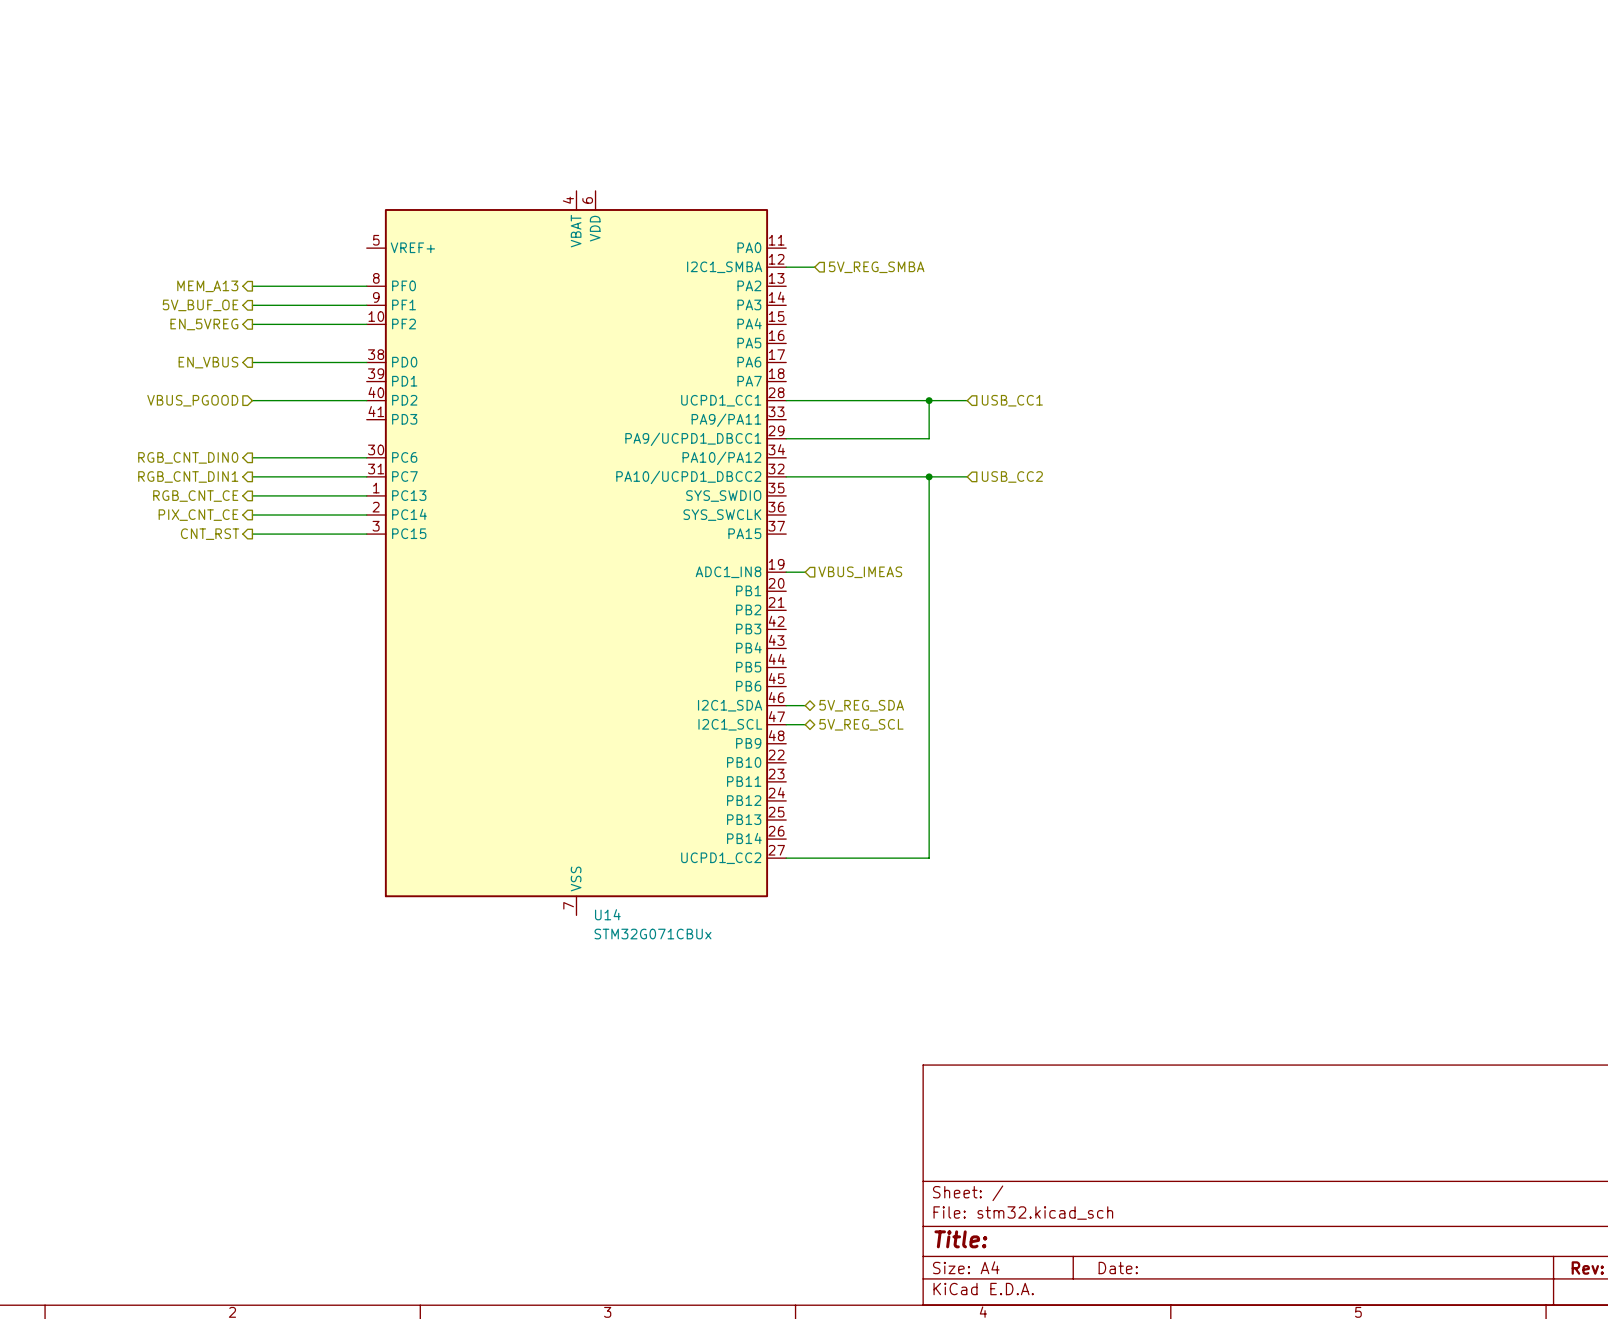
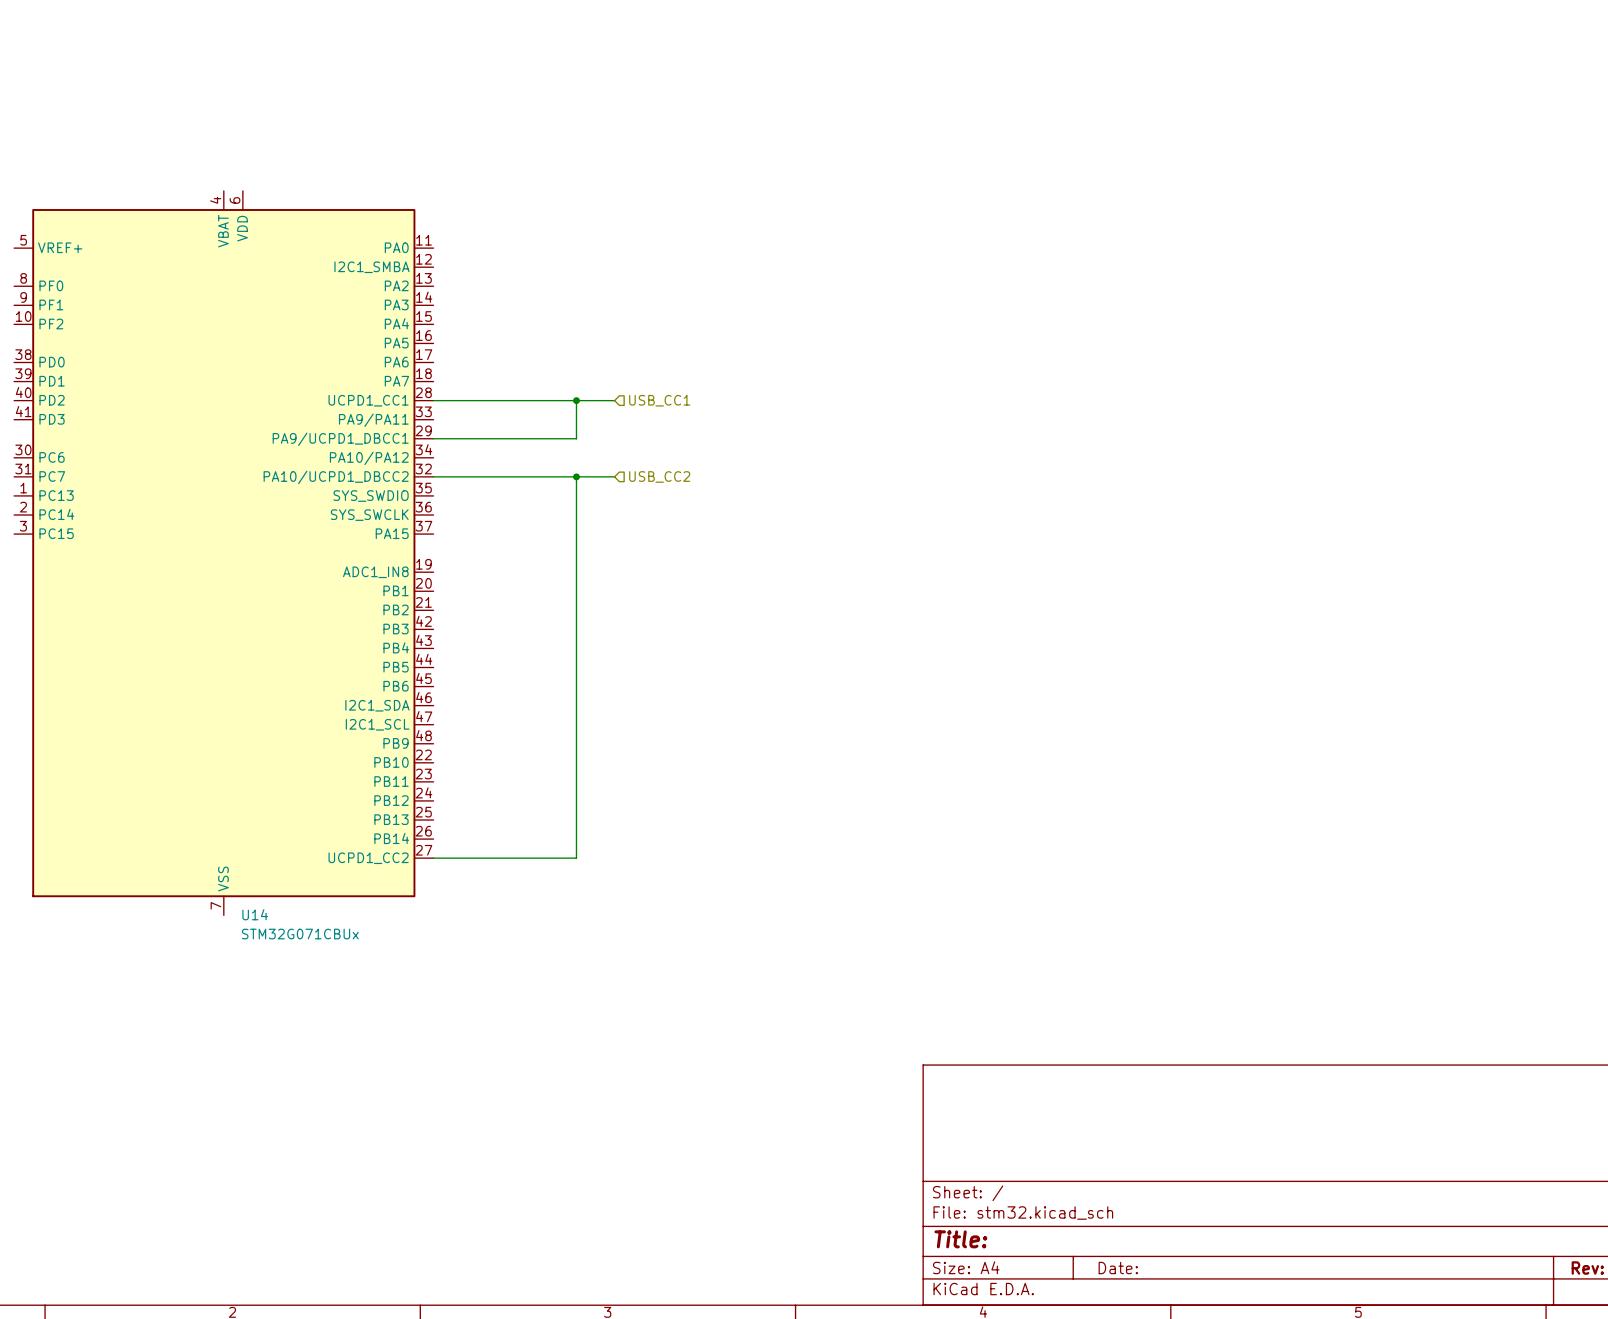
wire: (786, 267) (814, 267) -> none
hierarchical label: 5V_REG_SMBA (876, 267) -> none
hierarchical label: MEM_A13 (207, 286) -> none
hierarchical label: 5V_BUF_OE (200, 305) -> none
hierarchical label: EN_5VREG (204, 324) -> none
hierarchical label: EN_VBUS (208, 362) -> none
hierarchical label: VBUS_PGOOD (192, 400) -> none
junction: none -> (576, 400)
hierarchical label: none -> USB_CC1 (659, 400)
wire: (786, 400) (967, 400) -> none
wire: (929, 400) (929, 438) (786, 438) -> none
junction: (929, 400) -> none
hierarchical label: USB_CC1 (1012, 400) -> none
hierarchical label: RGB_CNT_DIN0 (188, 457) -> none
hierarchical label: RGB_CNT_DIN1 (188, 476) -> none
junction: none -> (576, 476)
hierarchical label: none -> USB_CC2 (659, 476)
wire: (786, 476) (967, 476) -> none
wire: (929, 476) (929, 858) (786, 858) -> none
junction: (929, 476) -> none
hierarchical label: USB_CC2 (1012, 476) -> none
hierarchical label: RGB_CNT_CE (195, 496) -> none
hierarchical label: PIX_CNT_CE (198, 515) -> none
hierarchical label: CNT_RST (210, 534) -> none
U14 position: (576, 553) -> (223, 553)
wire: (786, 572) (805, 572) -> none
hierarchical label: VBUS_IMEAS (860, 572) -> none
wire: (786, 705) (805, 705) -> none
hierarchical label: 5V_REG_SDA (861, 705) -> none
wire: (786, 724) (805, 724) -> none
hierarchical label: 5V_REG_SCL (861, 724) -> none

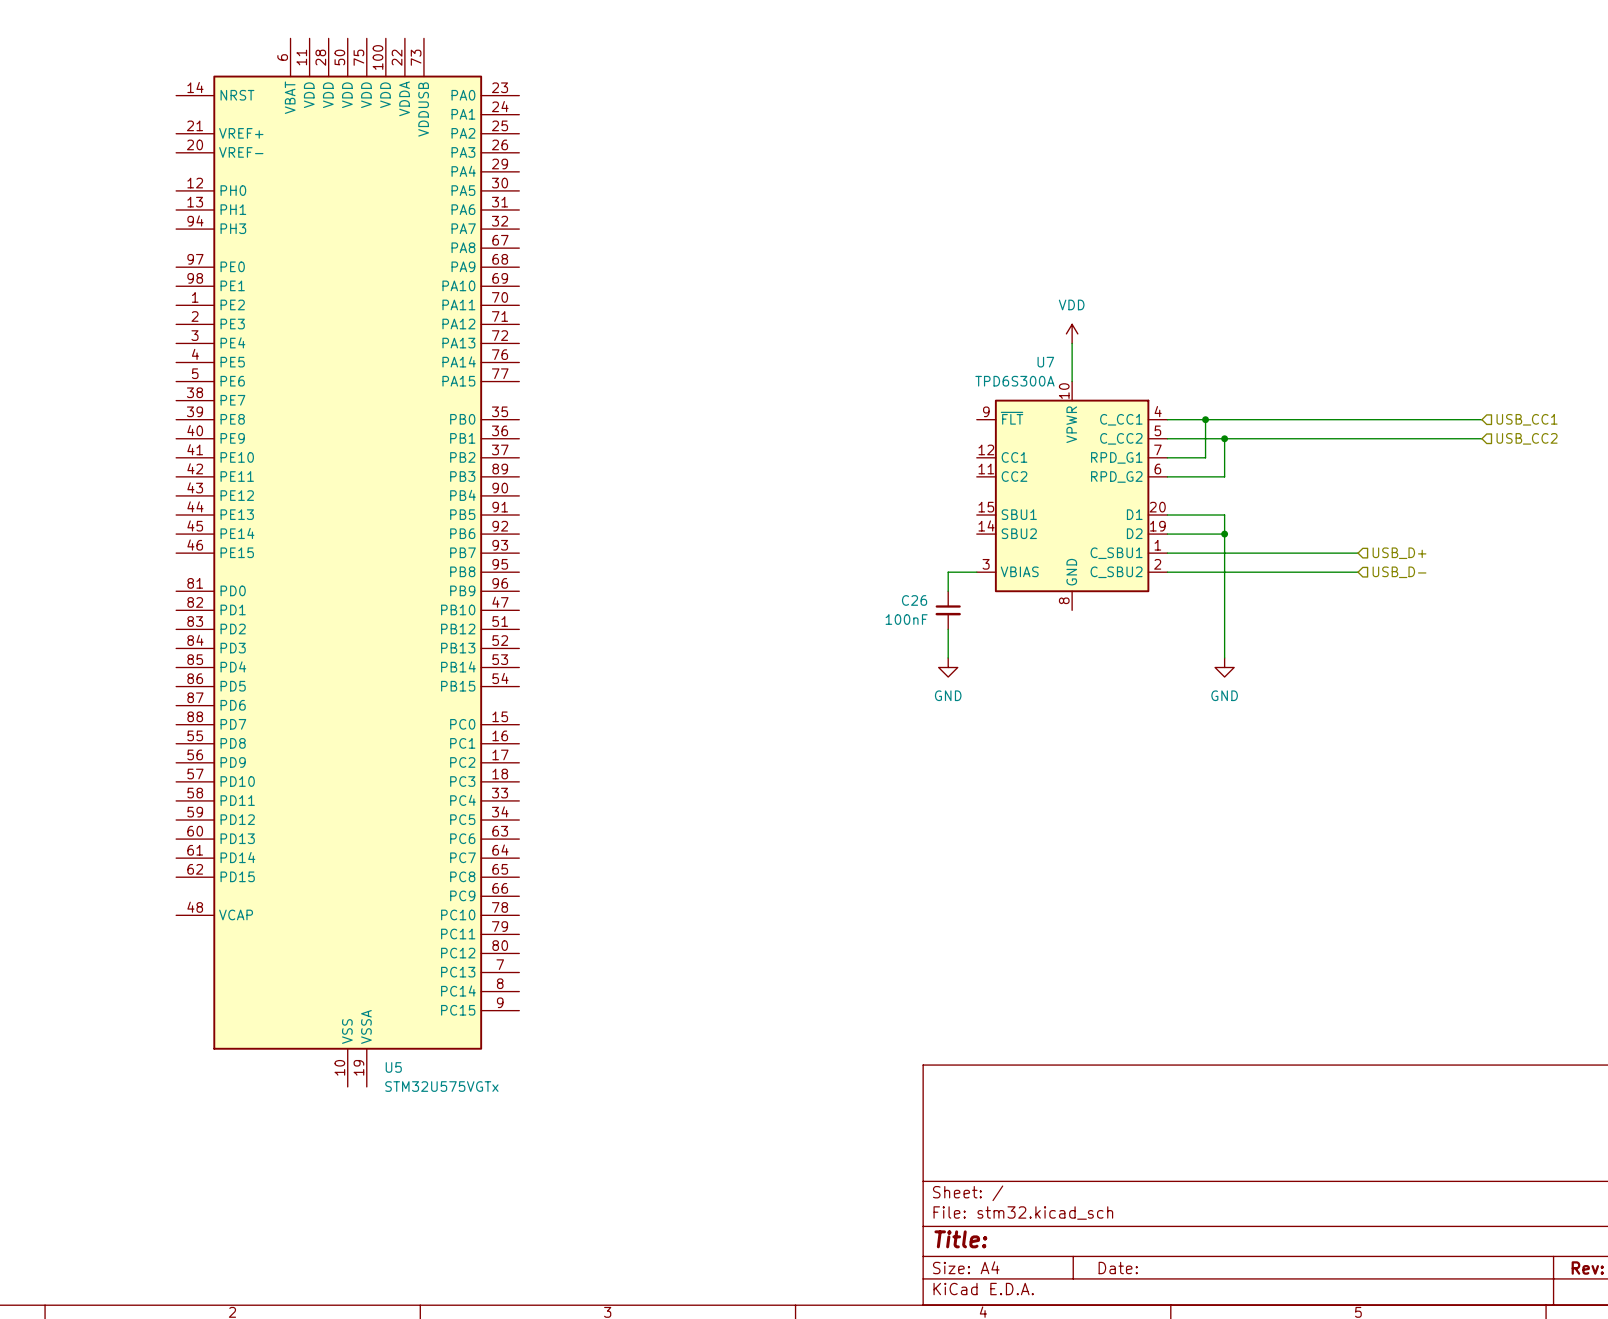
power symbol: none -> VDD (1072, 333)
wire: none -> (1072, 343) (1072, 381)
wire: (433, 400) (614, 400) -> none
wire: (576, 400) (576, 438) (433, 438) -> none
junction: (576, 400) -> none
hierarchical label: USB_CC1 (659, 400) -> none
wire: none -> (1167, 419) (1481, 419)
wire: none -> (1205, 419) (1205, 457) (1167, 457)
junction: none -> (1205, 419)
hierarchical label: none -> USB_CC1 (1527, 419)
wire: none -> (1167, 438) (1481, 438)
wire: none -> (1224, 438) (1224, 476) (1167, 476)
junction: none -> (1224, 438)
hierarchical label: none -> USB_CC2 (1527, 438)
wire: (433, 476) (614, 476) -> none
wire: (576, 476) (576, 858) (433, 858) -> none
junction: (576, 476) -> none
hierarchical label: USB_CC2 (659, 476) -> none
U7: none -> TPD6S300A (1072, 495)
wire: none -> (1167, 515) (1224, 515) (1224, 657)
wire: none -> (1167, 534) (1224, 534)
junction: none -> (1224, 534)
U14: STM32G071CBUx (223, 553) -> none
wire: none -> (1167, 553) (1358, 553)
hierarchical label: none -> USB_D+ (1399, 553)
U5: none -> STM32U575VGTx (347, 562)
wire: none -> (976, 572) (948, 572) (948, 591)
wire: none -> (1167, 572) (1358, 572)
hierarchical label: none -> USB_D- (1399, 572)
C26: none -> 100nF (948, 610)
wire: none -> (948, 629) (948, 657)
power symbol: none -> GND (948, 667)
power symbol: none -> GND (1224, 667)

